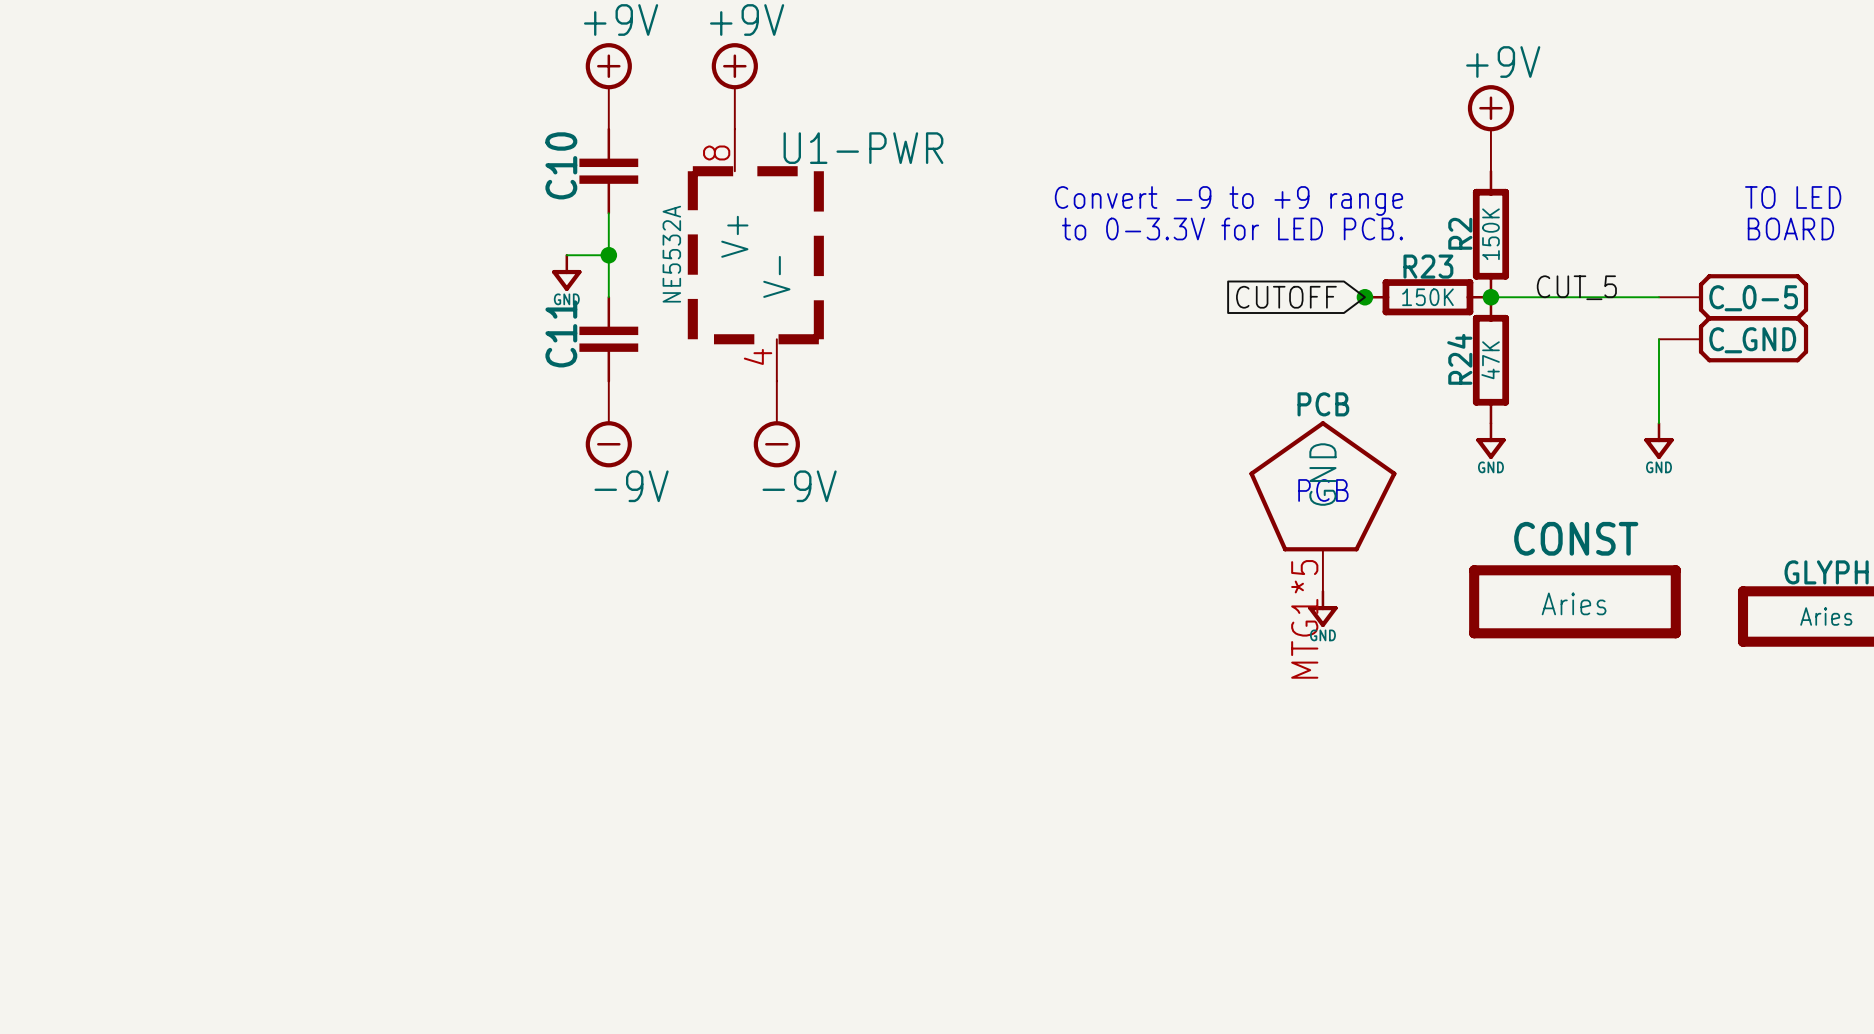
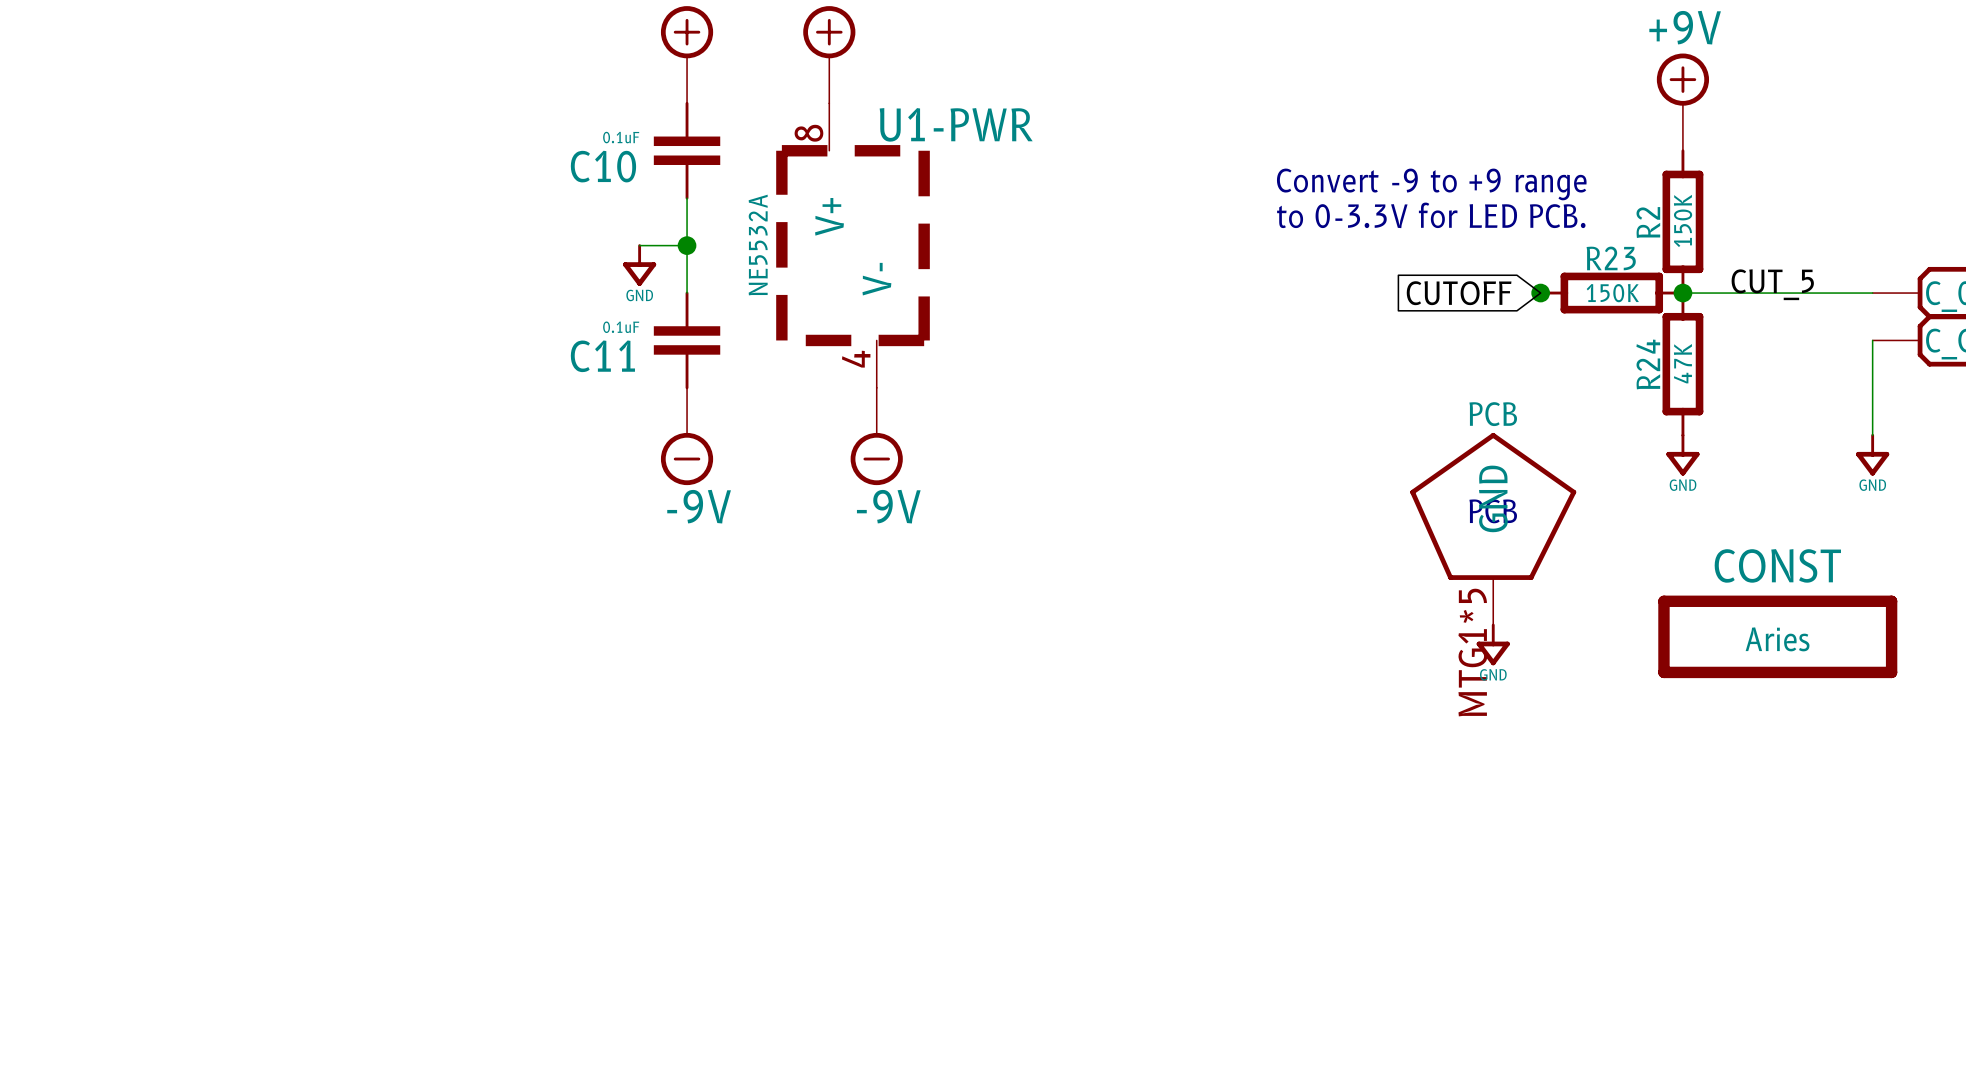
C10 value: none -> 0.1uF (621, 137)
C10 name rotation: 0° (561, 165) -> 90° clockwise (603, 166)
C11 value: none -> 0.1uF (621, 327)
C11 name rotation: 0° (561, 333) -> 90° clockwise (602, 356)

